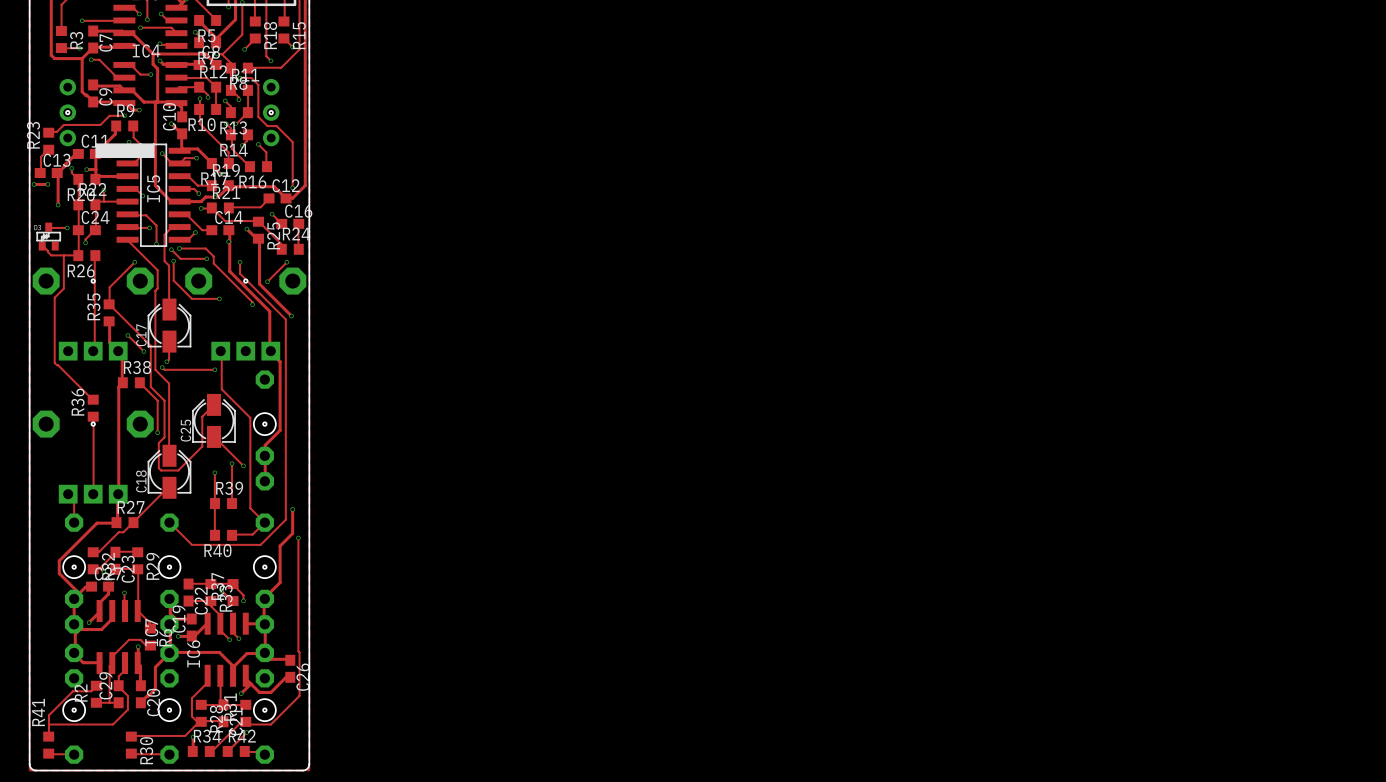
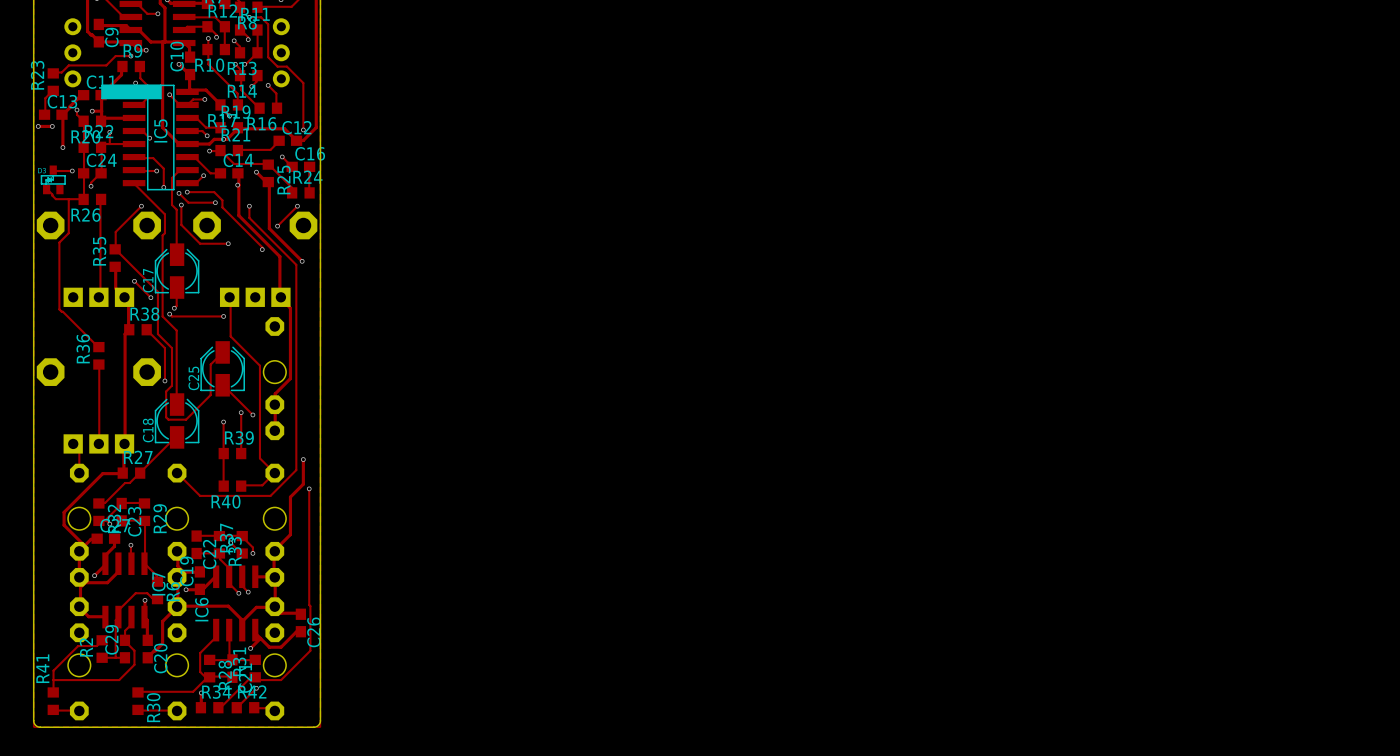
hole: (67, 112) -> none
hole: (271, 112) -> none
hole: (93, 281) -> none
hole: (245, 281) -> none
hole: (93, 424) -> none
hole: (264, 424) -> none
hole: (74, 567) -> none
hole: (169, 567) -> none
hole: (264, 567) -> none
hole: (74, 710) -> none
hole: (169, 710) -> none
hole: (264, 710) -> none

